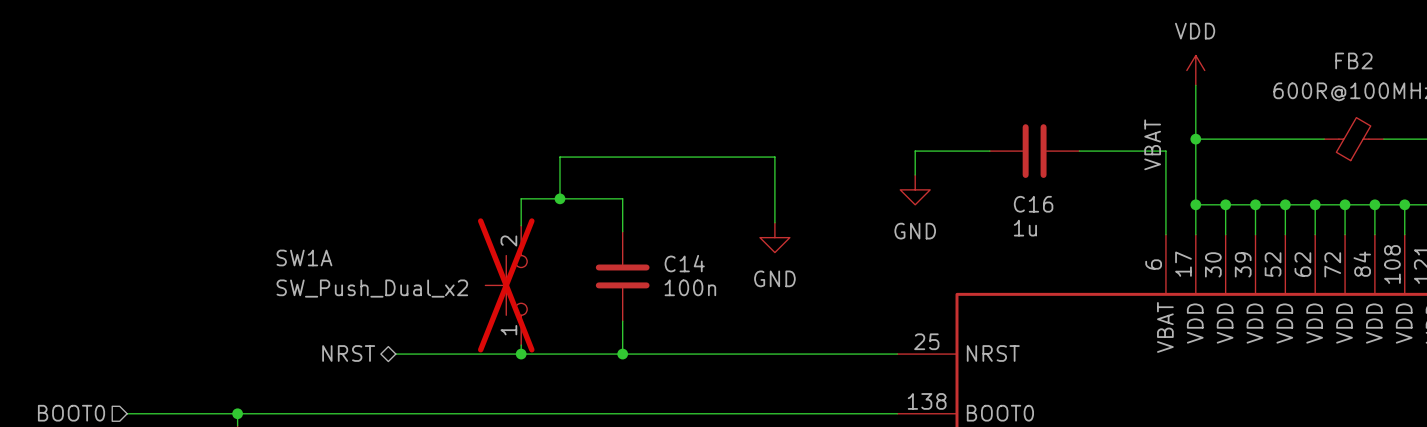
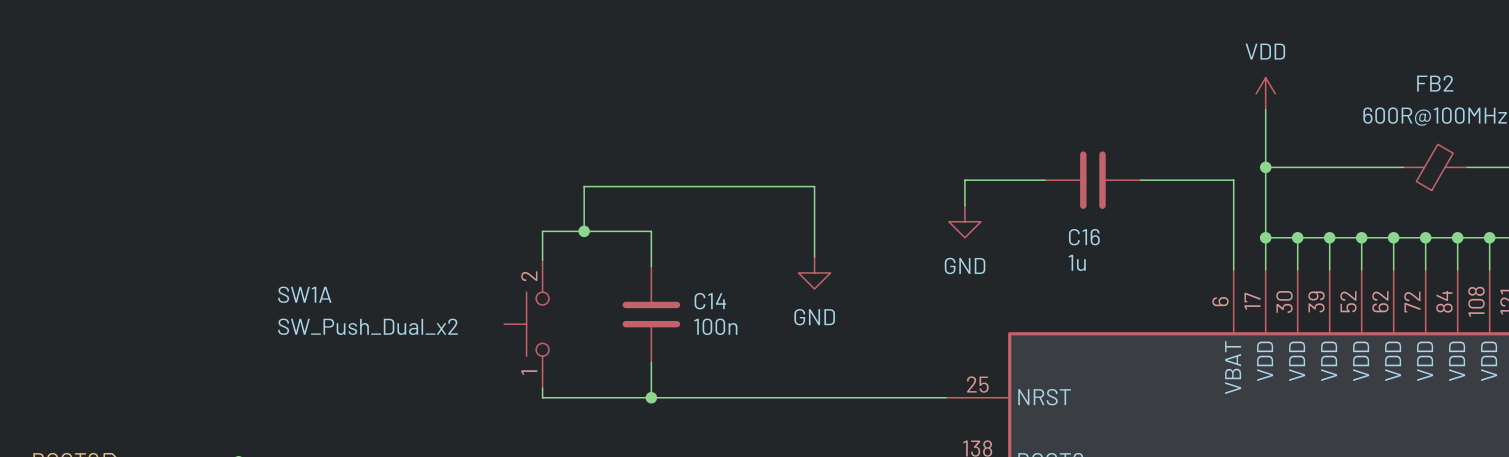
label: VBAT (1152, 144) -> none
SW1A do-not-place cross: (506, 285) -> none
hierarchical label: NRST (348, 353) -> none
wire: (395, 354) (521, 354) -> none
junction: (521, 354) -> none

